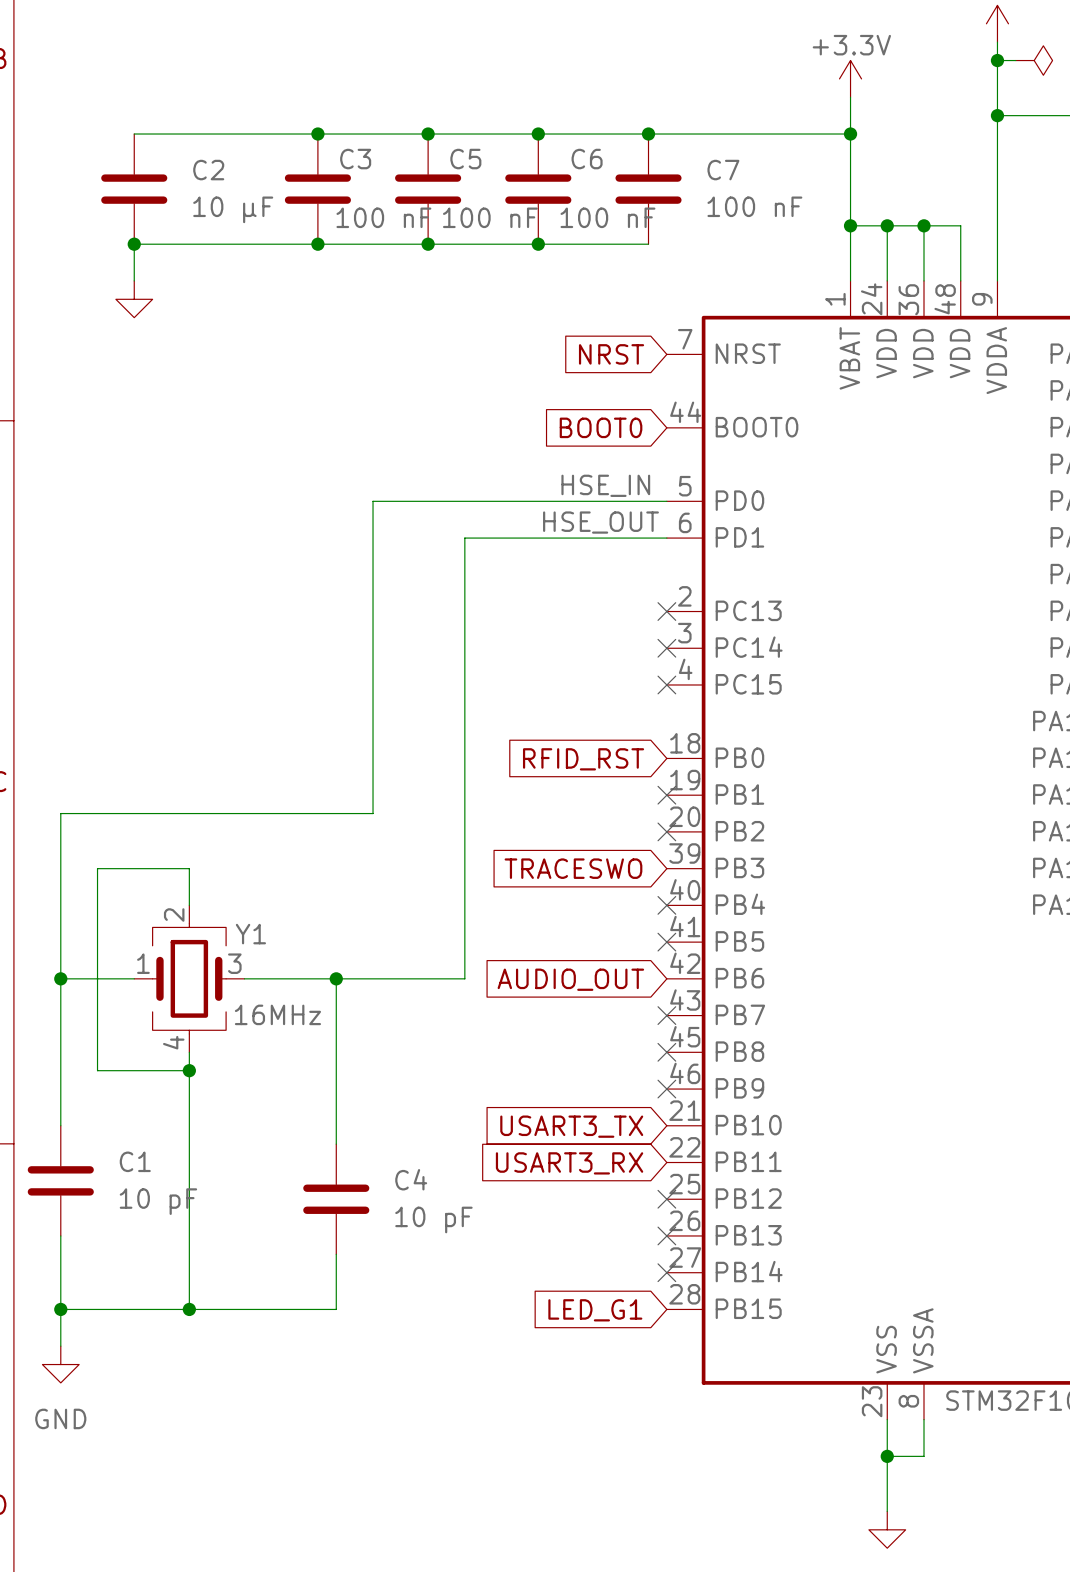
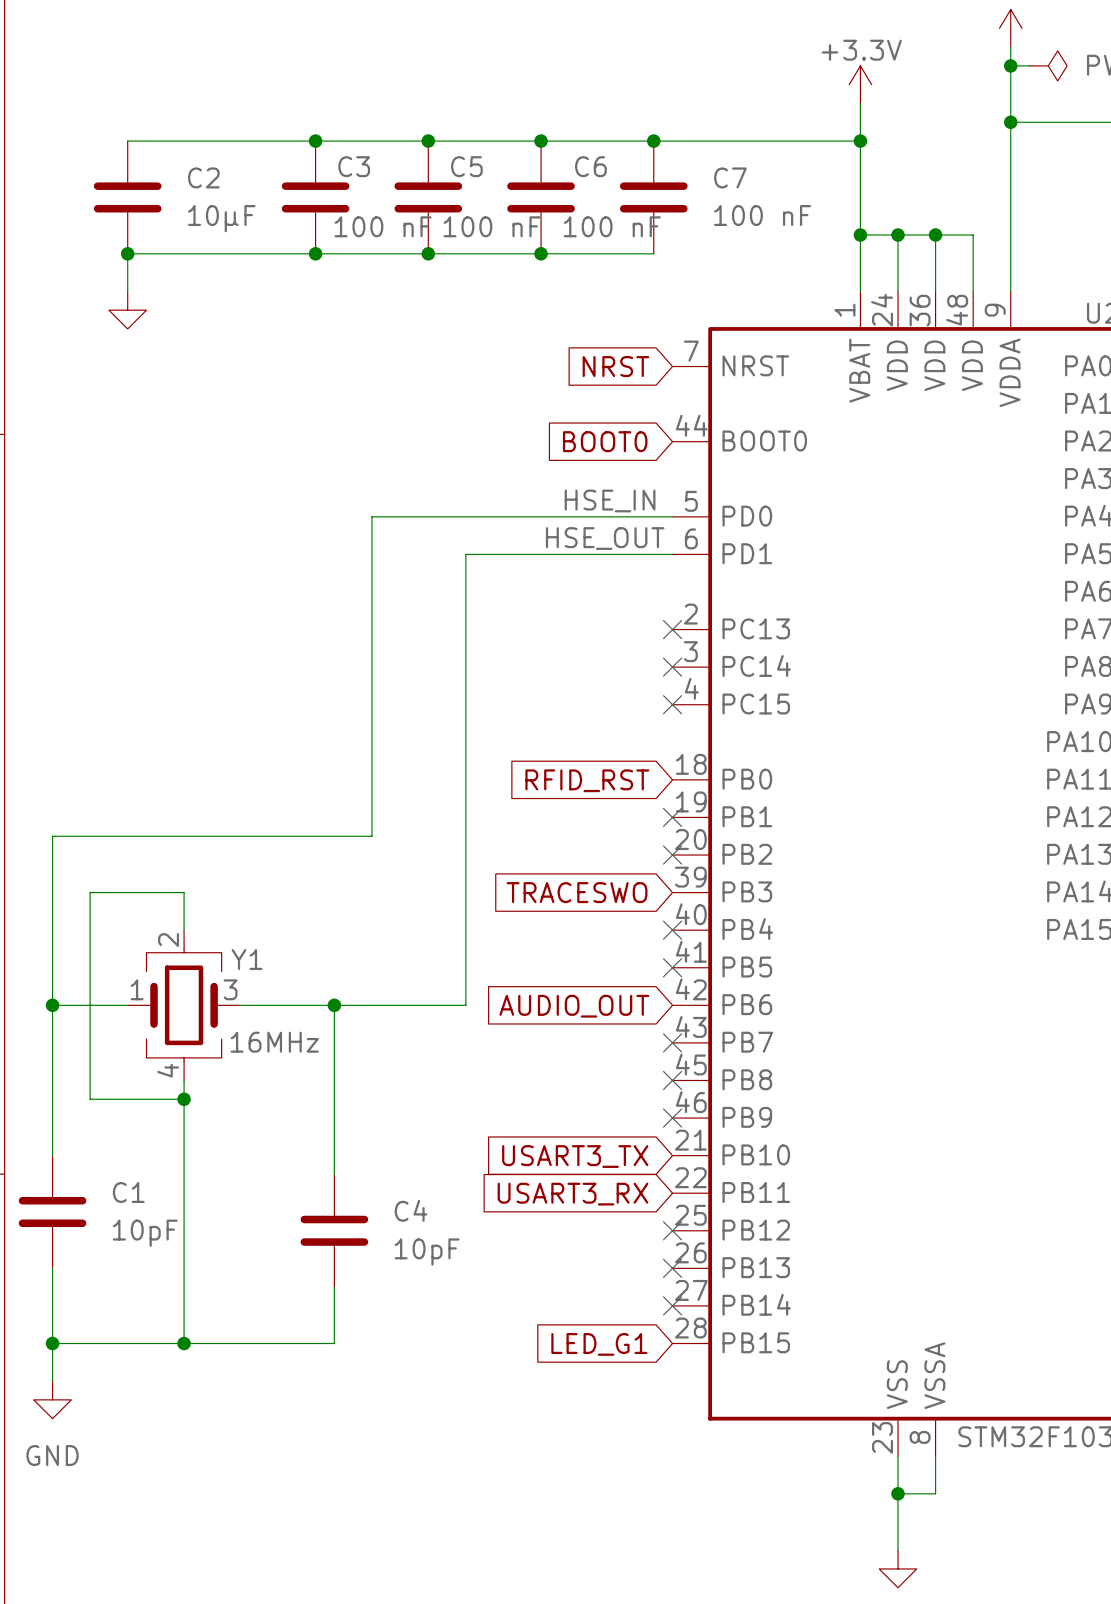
C2 value: 10 µF (233, 209) -> 10µF (221, 218)
C1 value: 10 pF (158, 1201) -> 10pF (145, 1233)
C4 value: 10 pF (433, 1219) -> 10pF (427, 1252)

